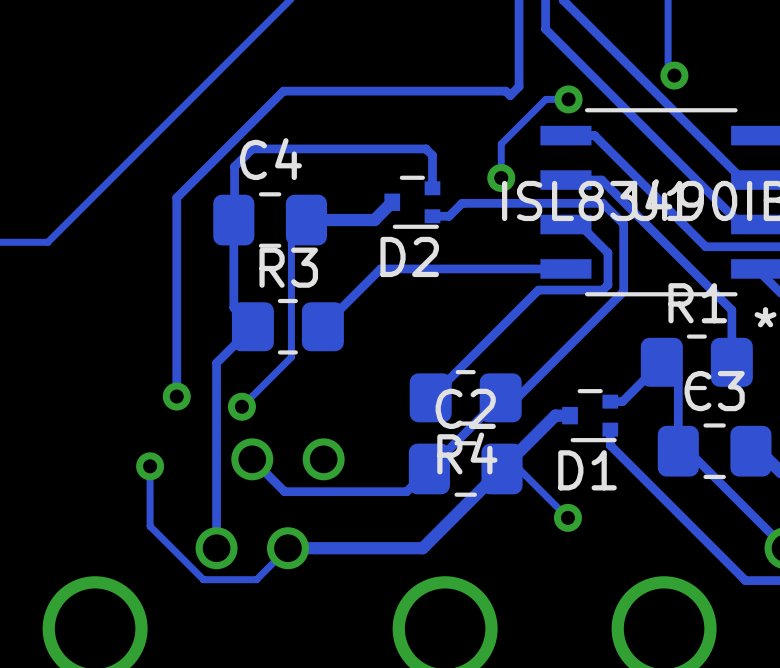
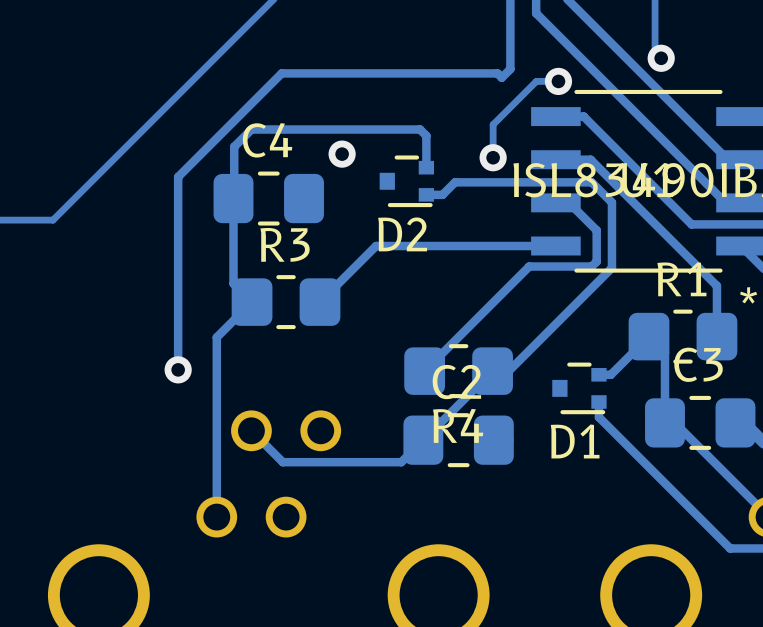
via: none -> (342, 154)
track: (392, 202) (374, 220) (306, 220) -> none
track: (291, 235) (291, 357) (241, 406) -> none
via: (241, 406) -> none
track: (570, 415) (555, 415) (422, 548) (287, 548) (256, 579) (203, 579) (150, 526) (150, 466) -> none
via: (150, 466) -> none
track: (519, 468) (567, 517) -> none
via: (567, 517) -> none

